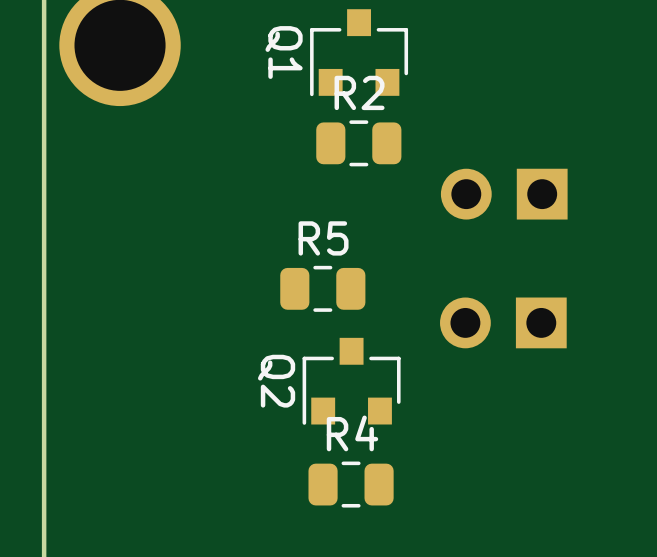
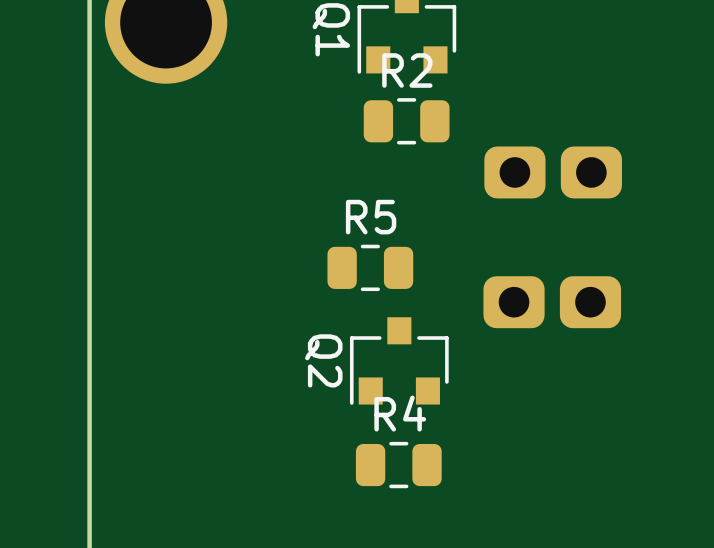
part footprint: [440, 168, 568, 220] -> [484, 146, 622, 199]
part footprint: [440, 297, 567, 349] -> [483, 276, 622, 329]

